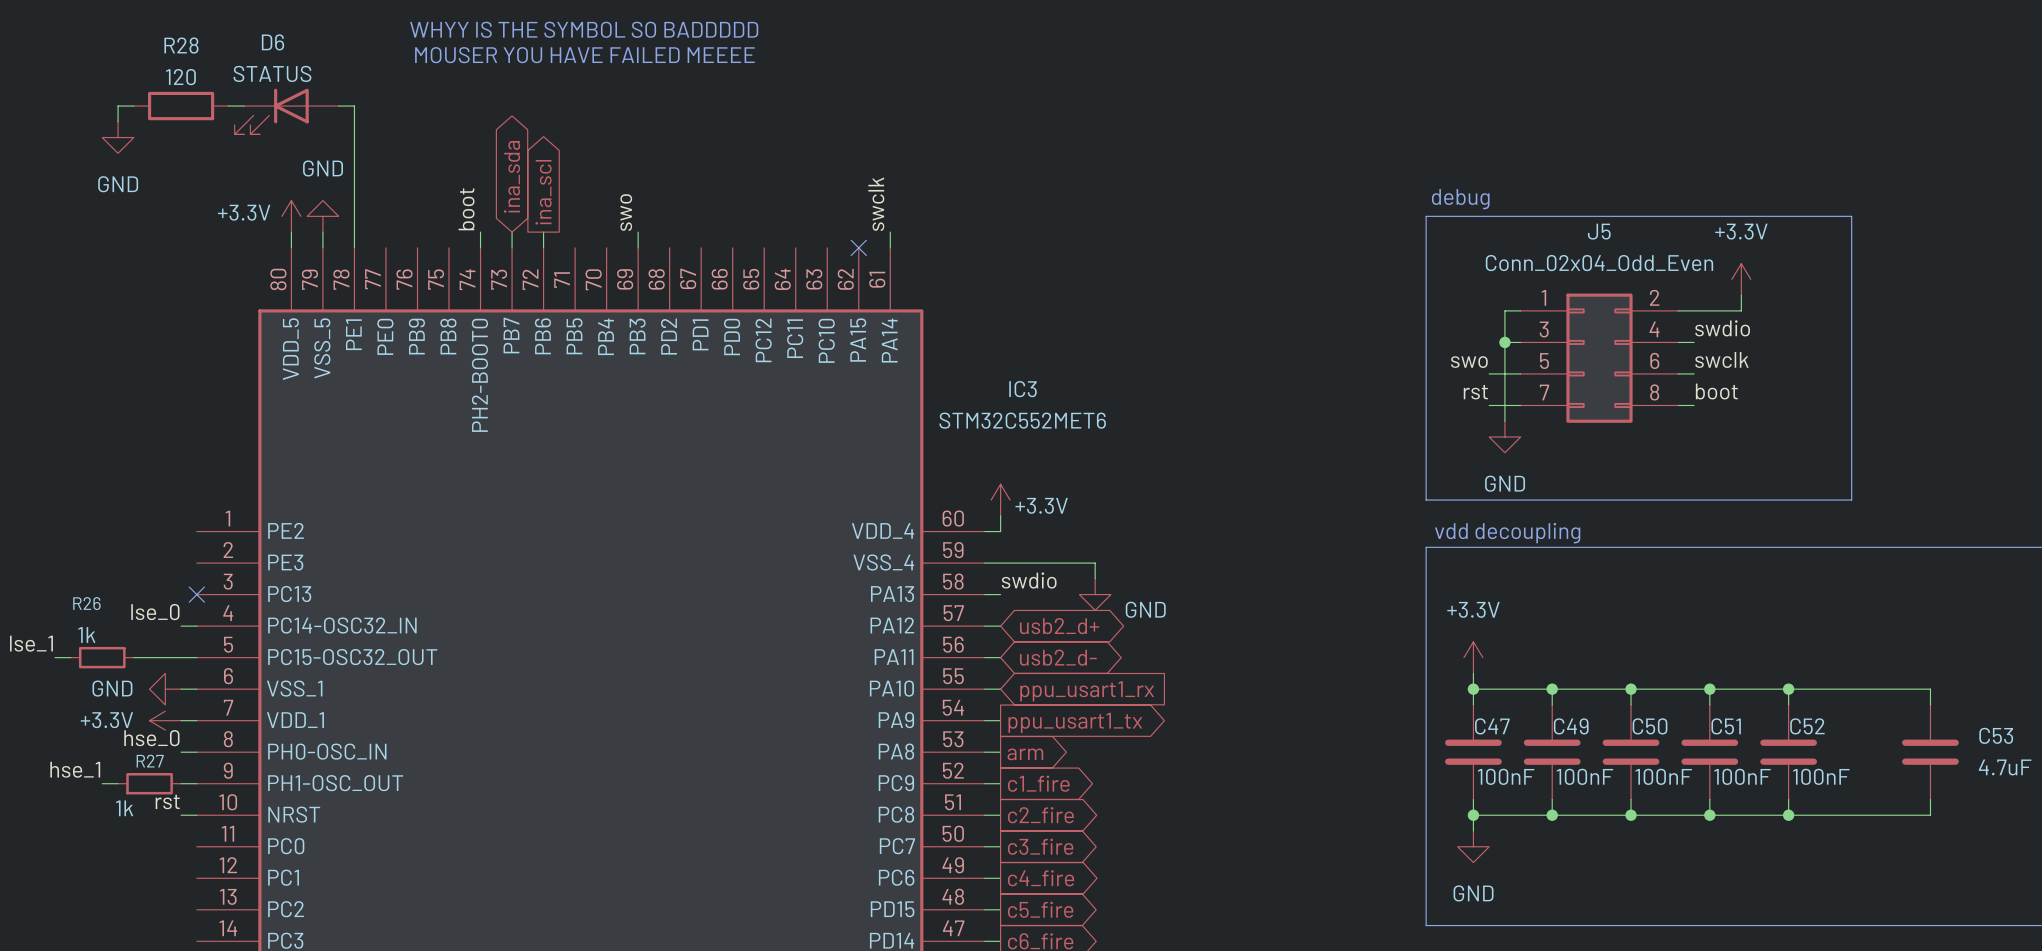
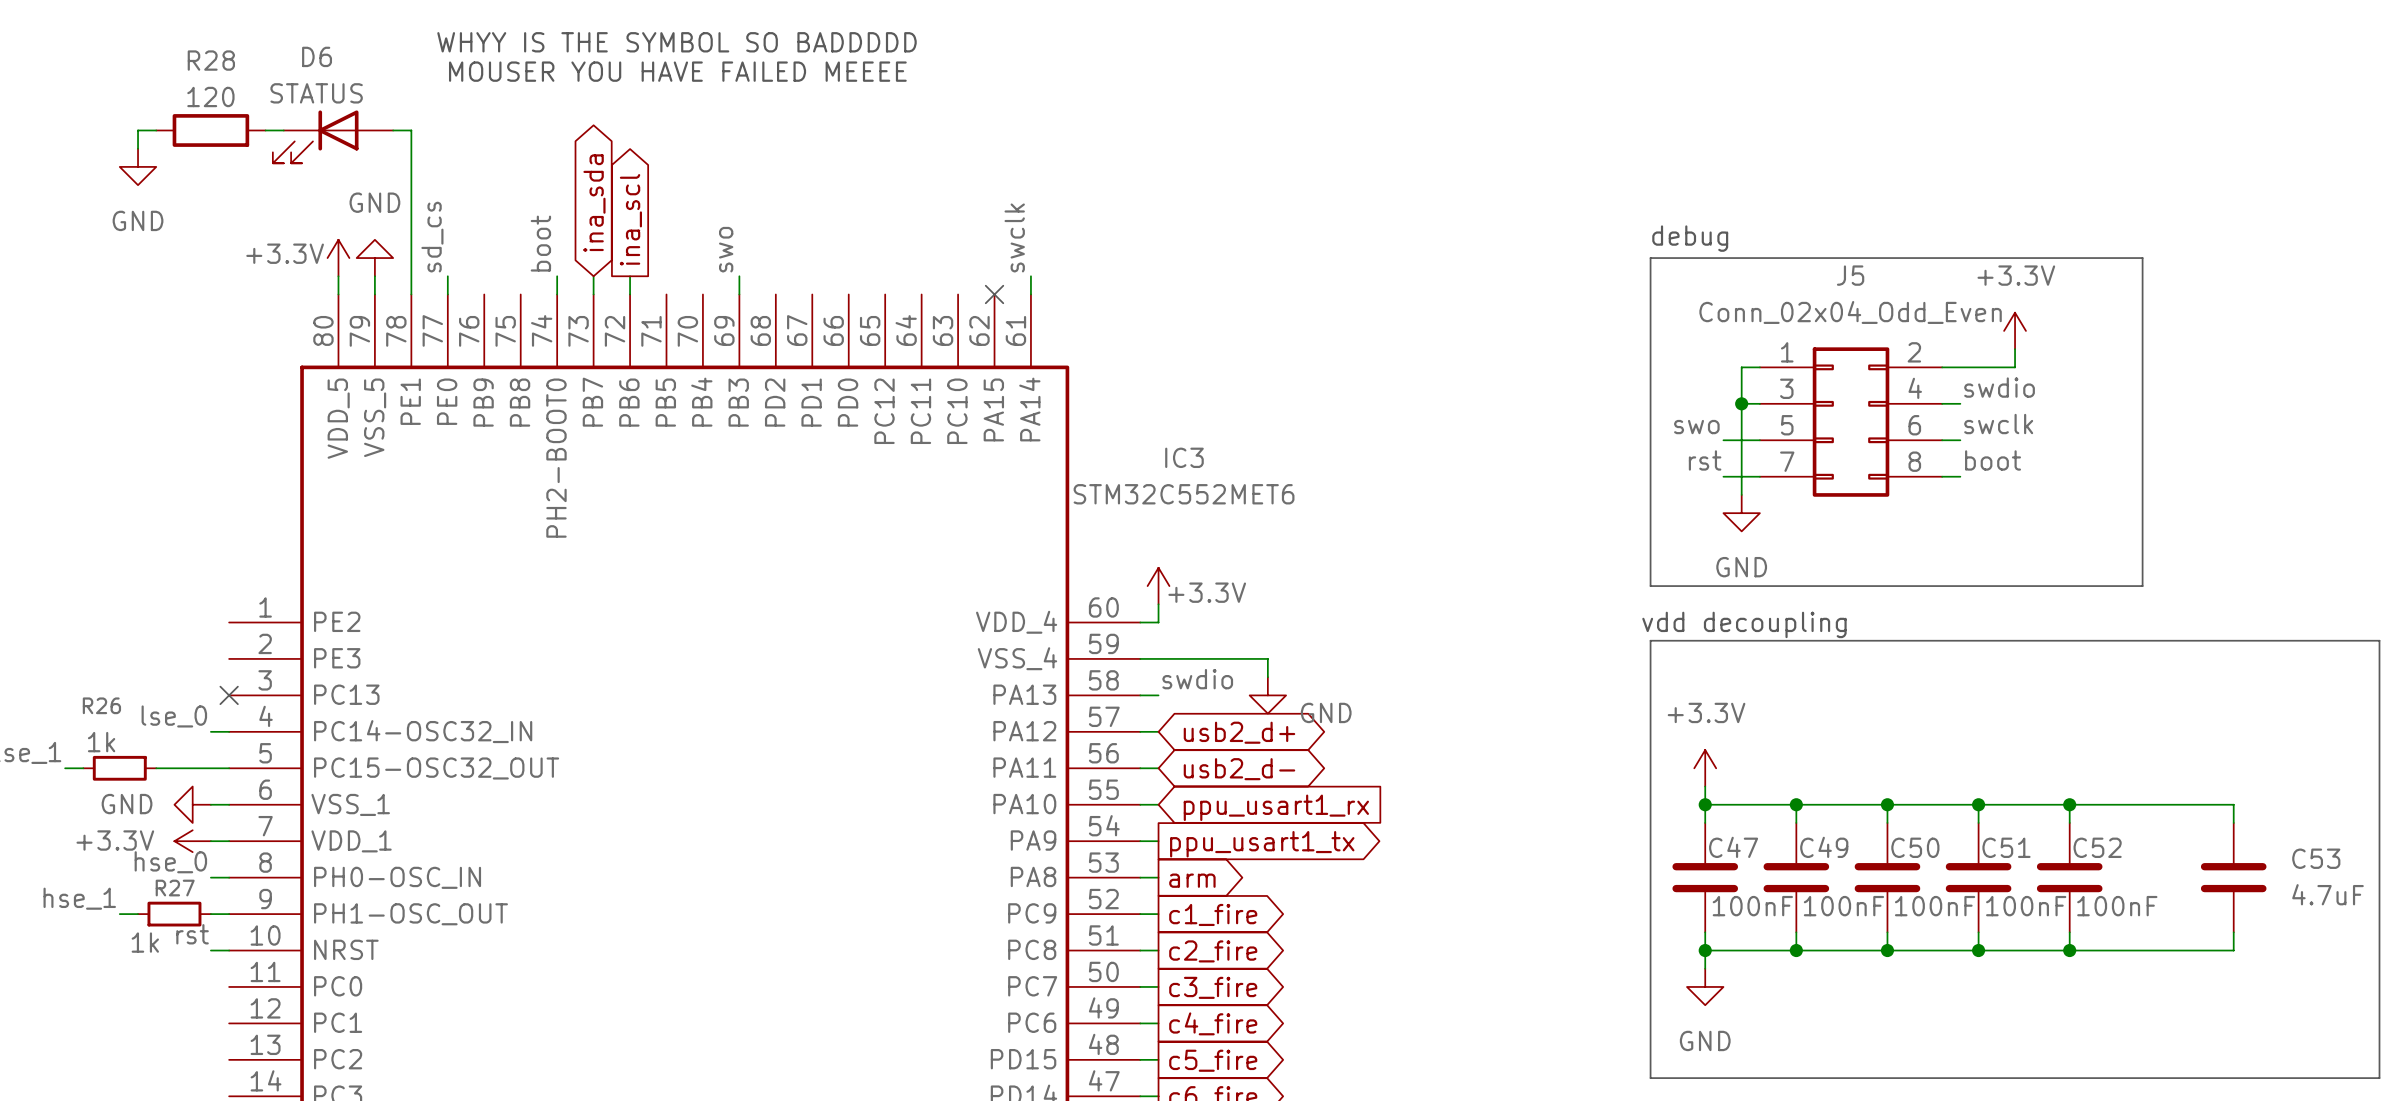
label: none -> sd_cs (432, 237)
wire: none -> (447, 276) (447, 294)

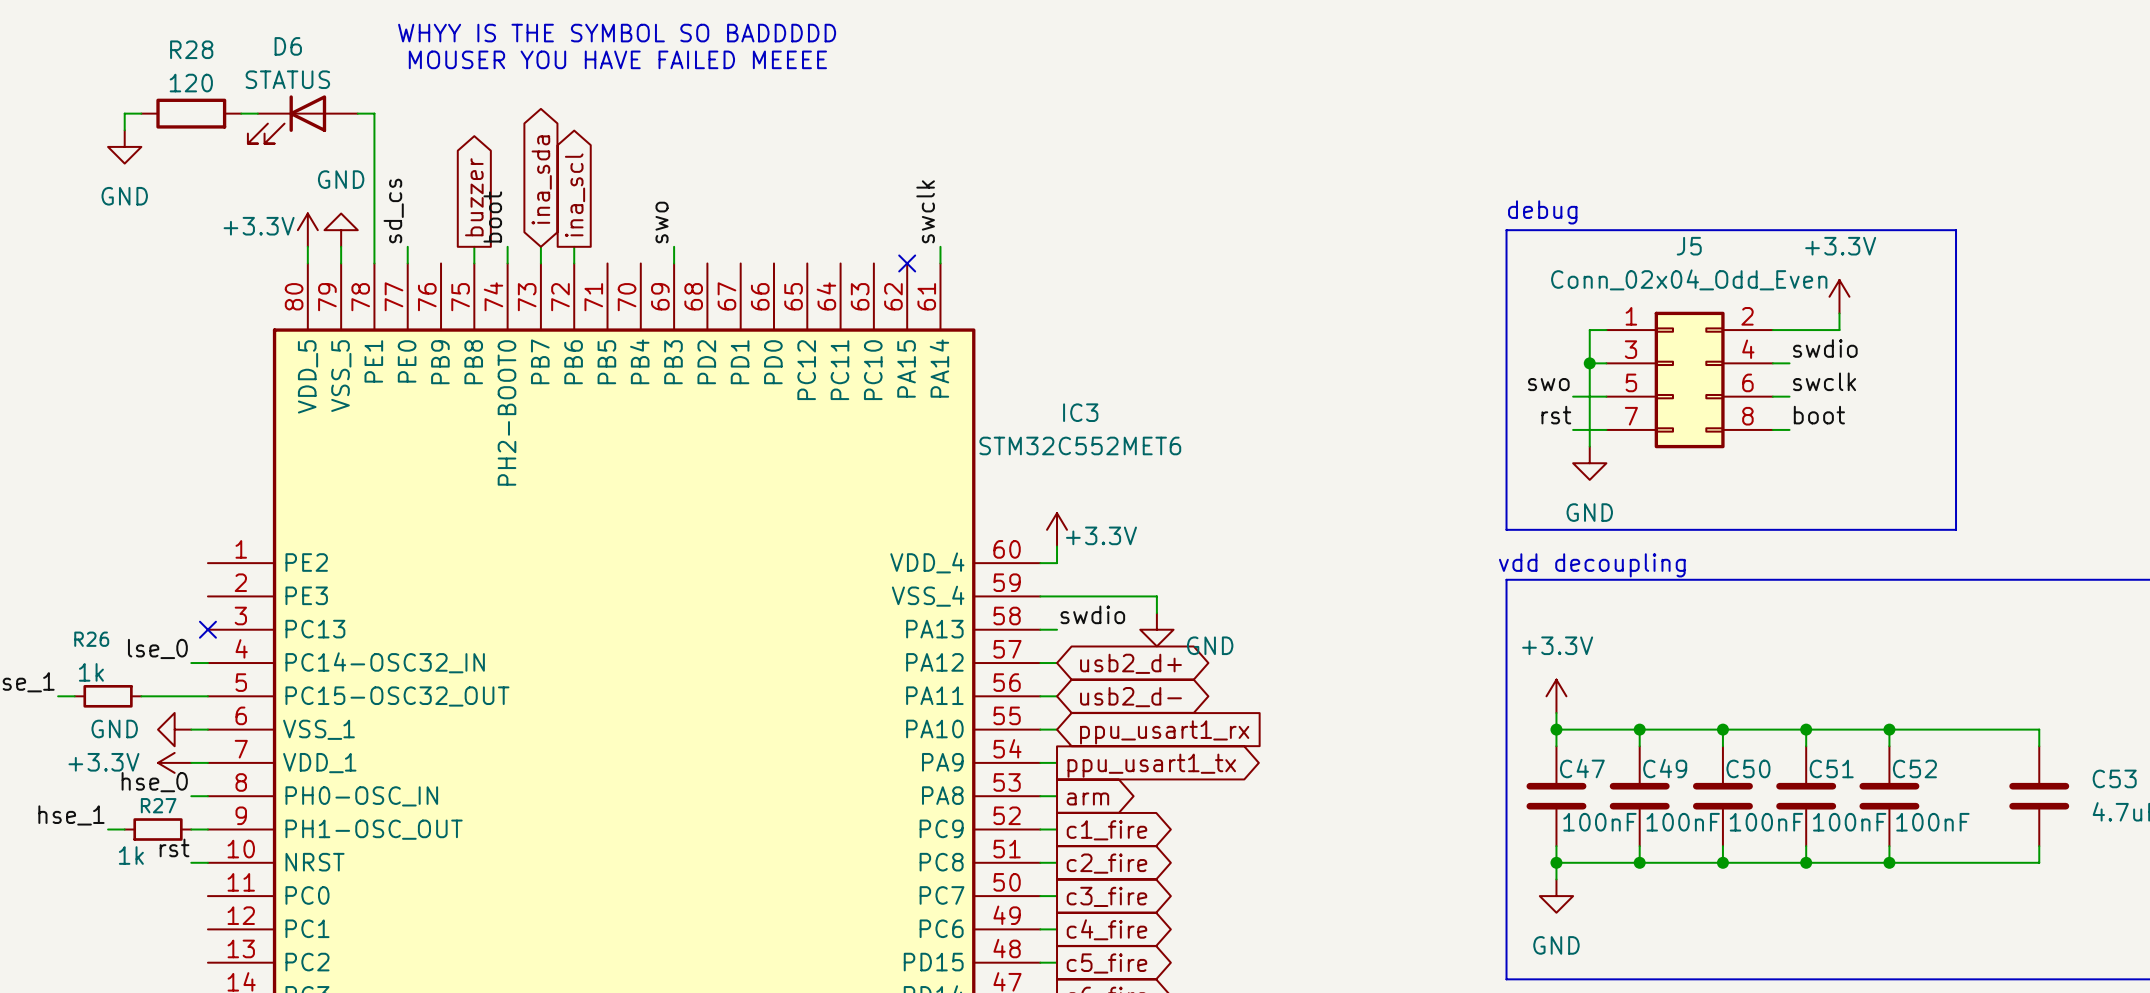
global label: none -> buzzer (474, 197)
wire: none -> (474, 246) (474, 263)

